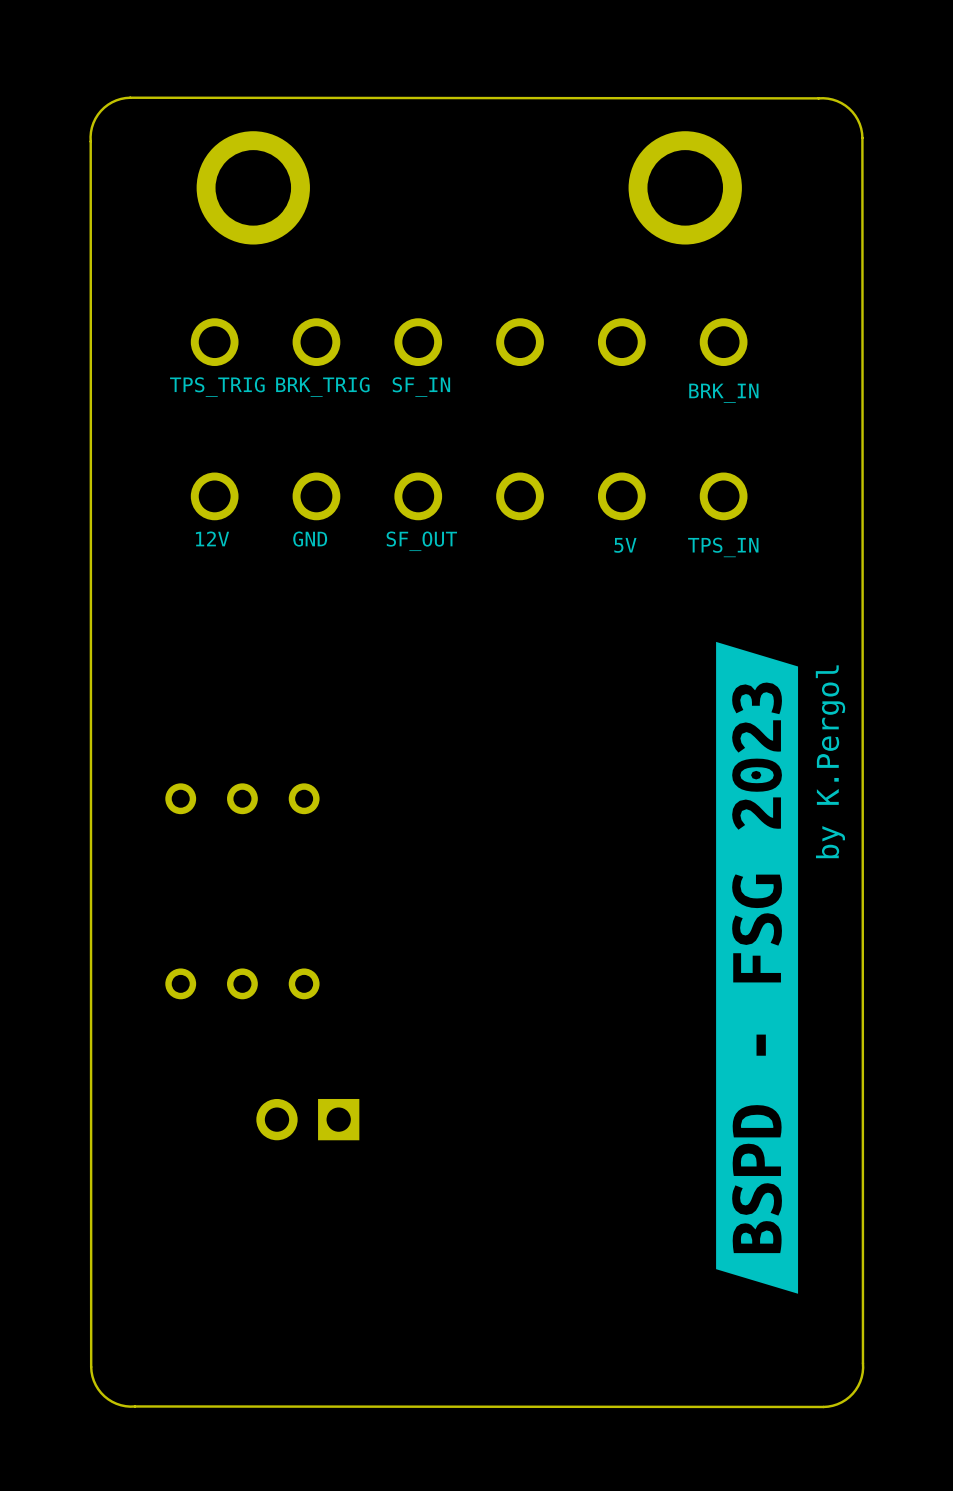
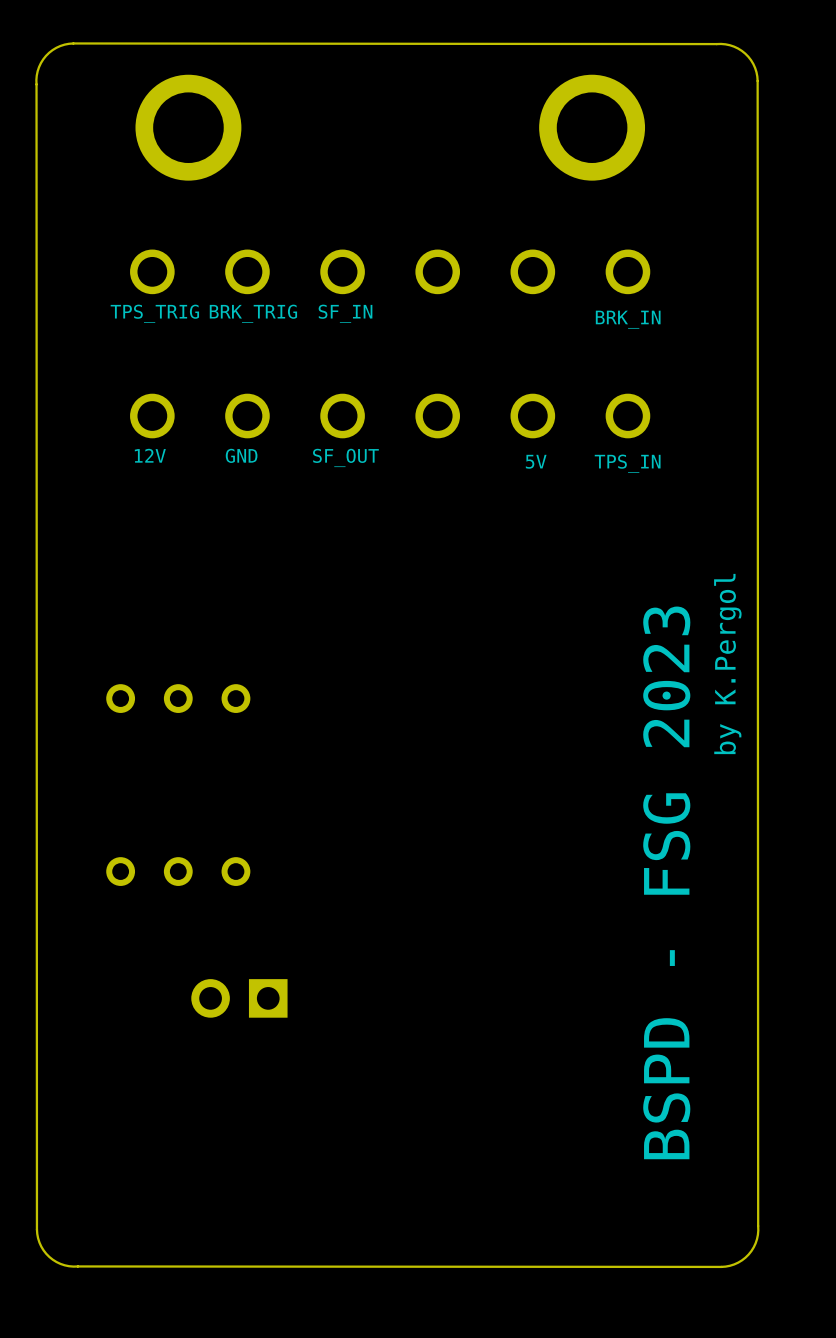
drawing: [716, 641, 799, 1294] -> none
text: none -> BSPD - FSG 2023 (666, 882)

